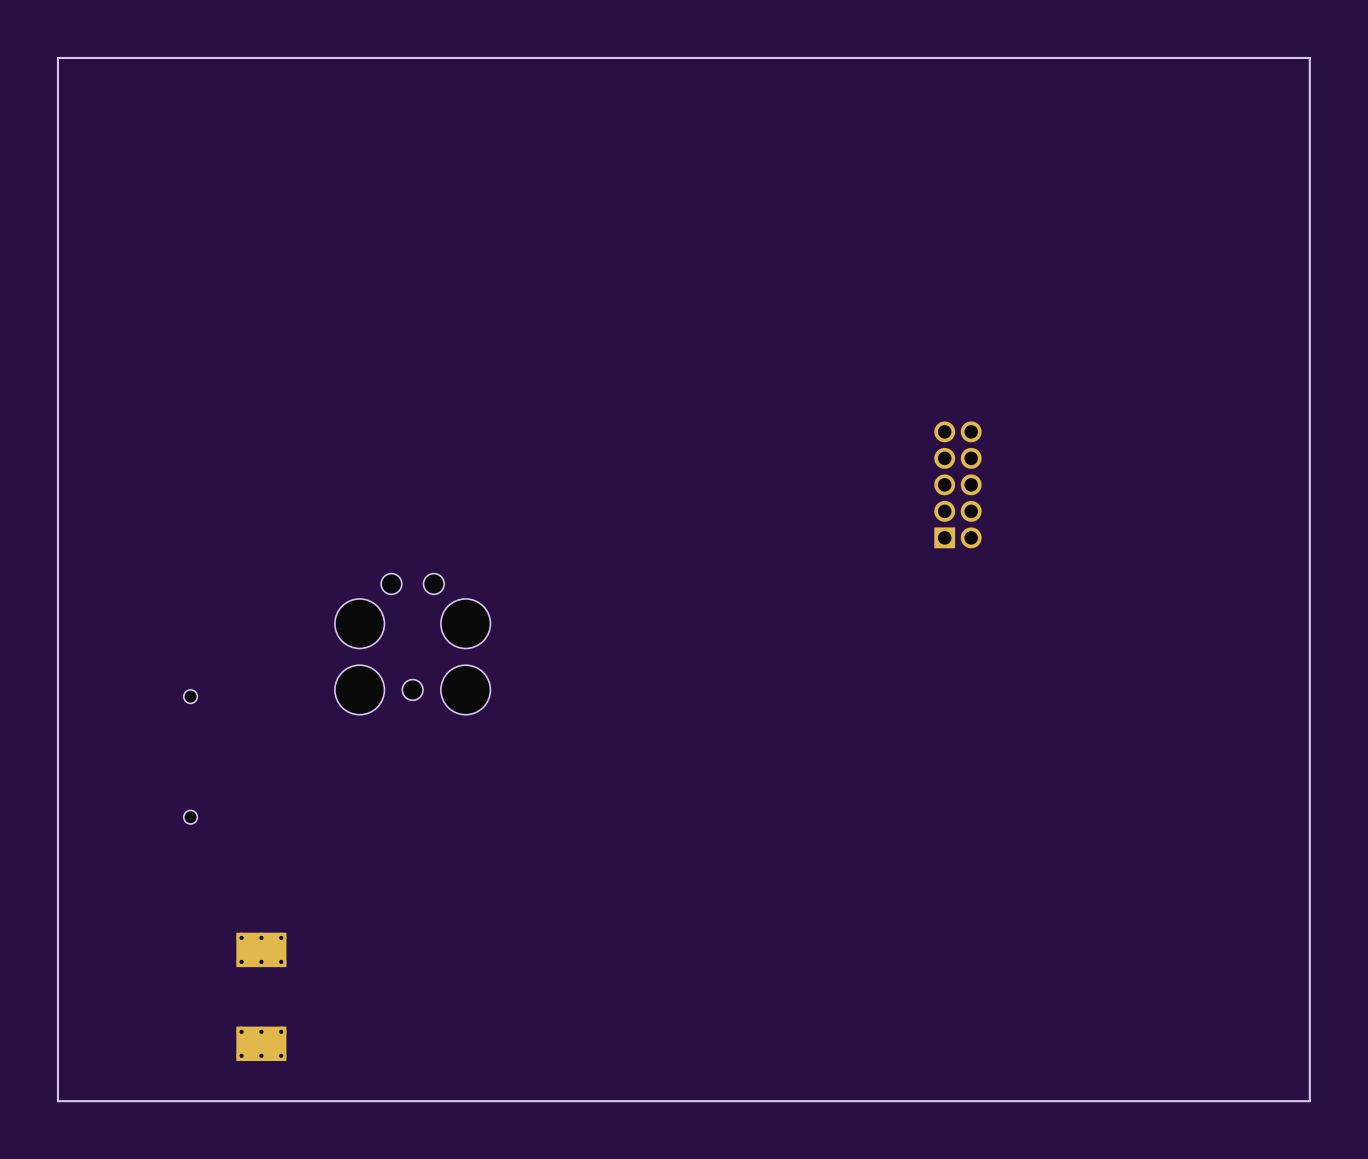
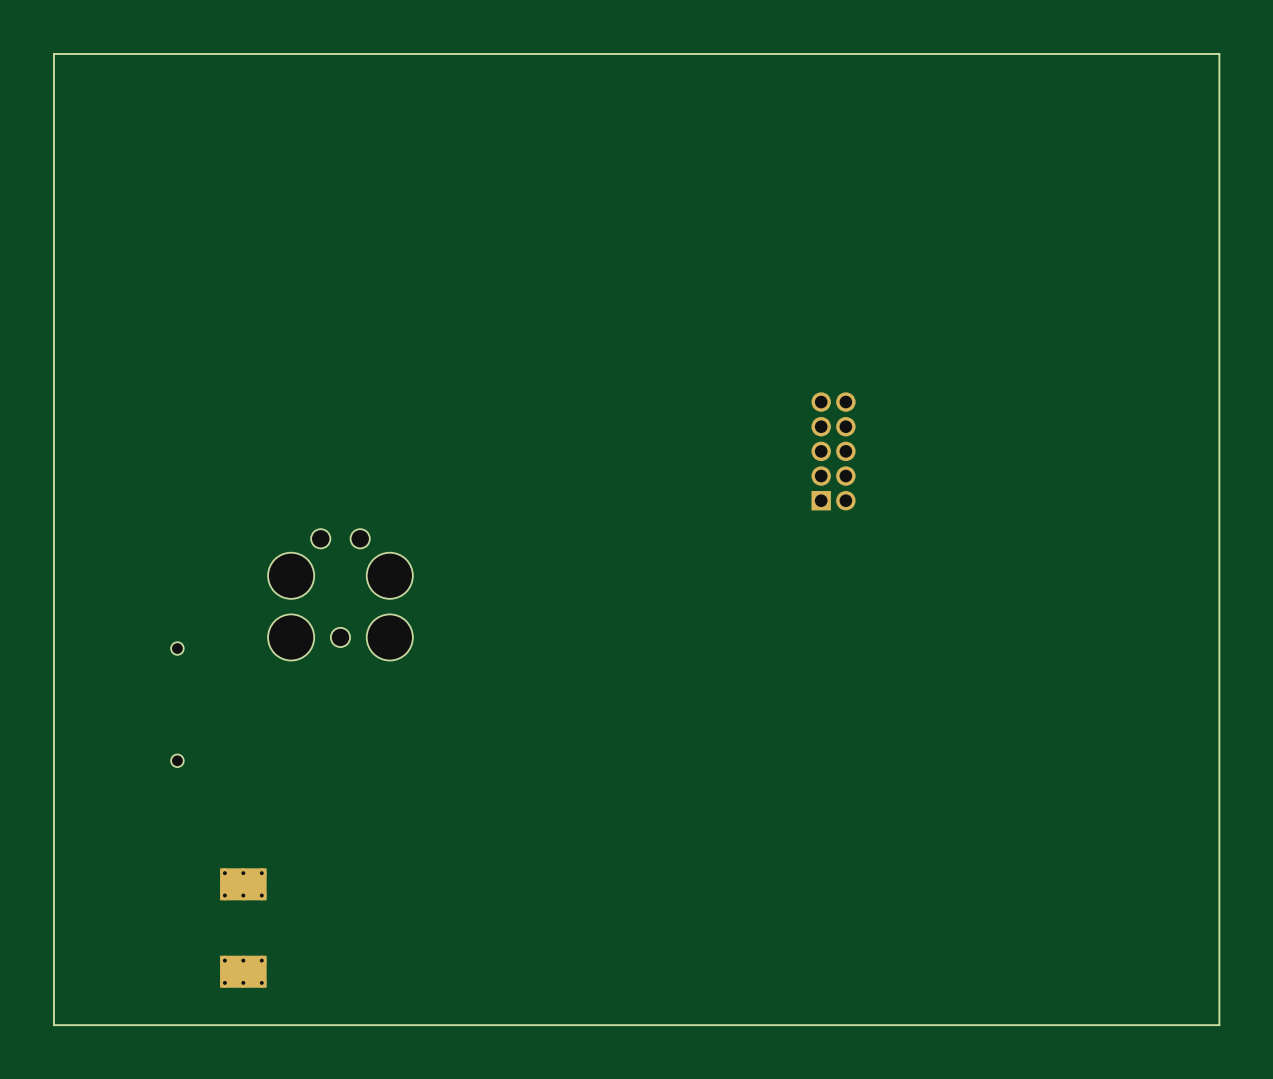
part position: (957, 484) -> (833, 451)
part position: (412, 644) -> (340, 594)

